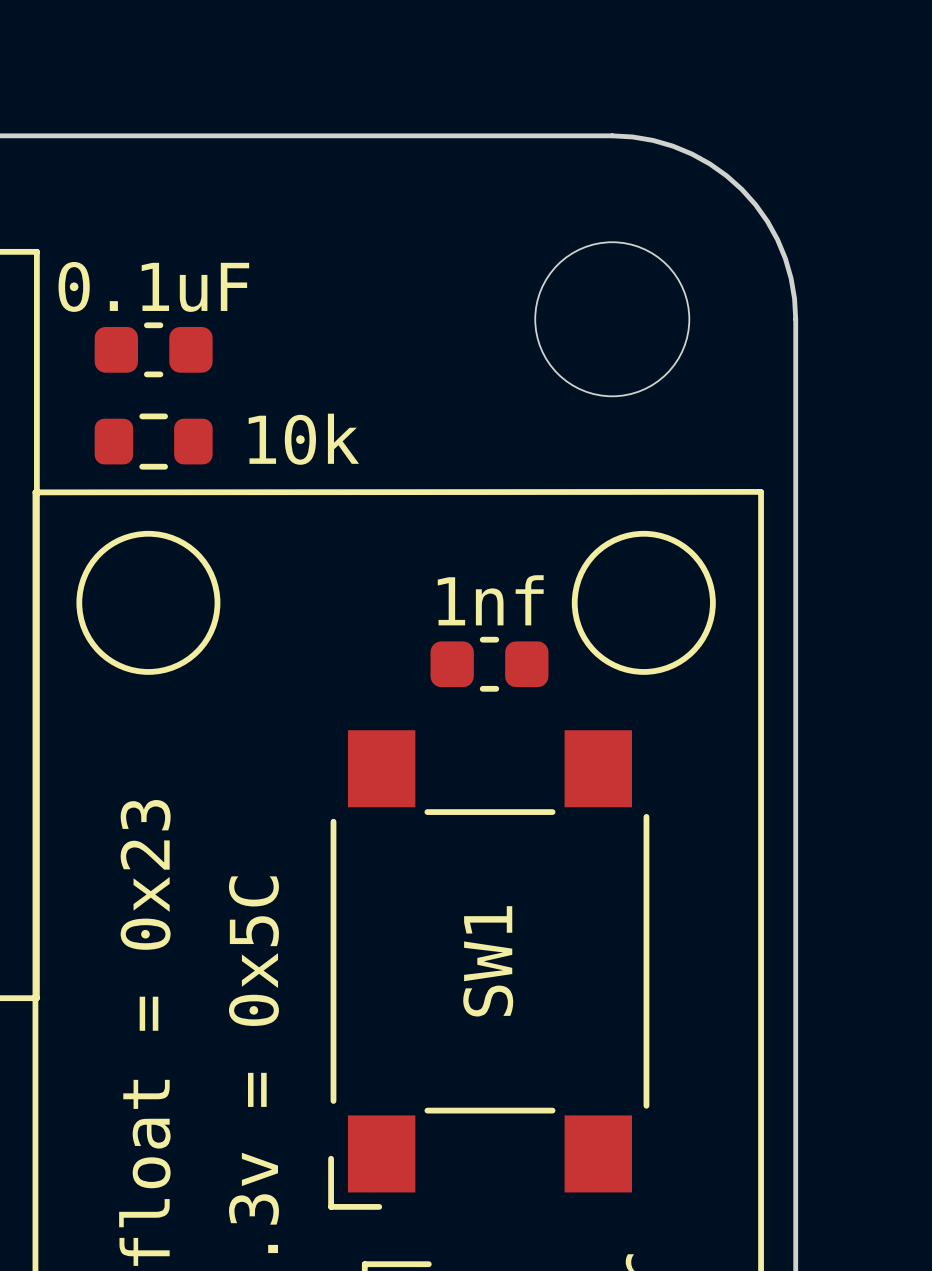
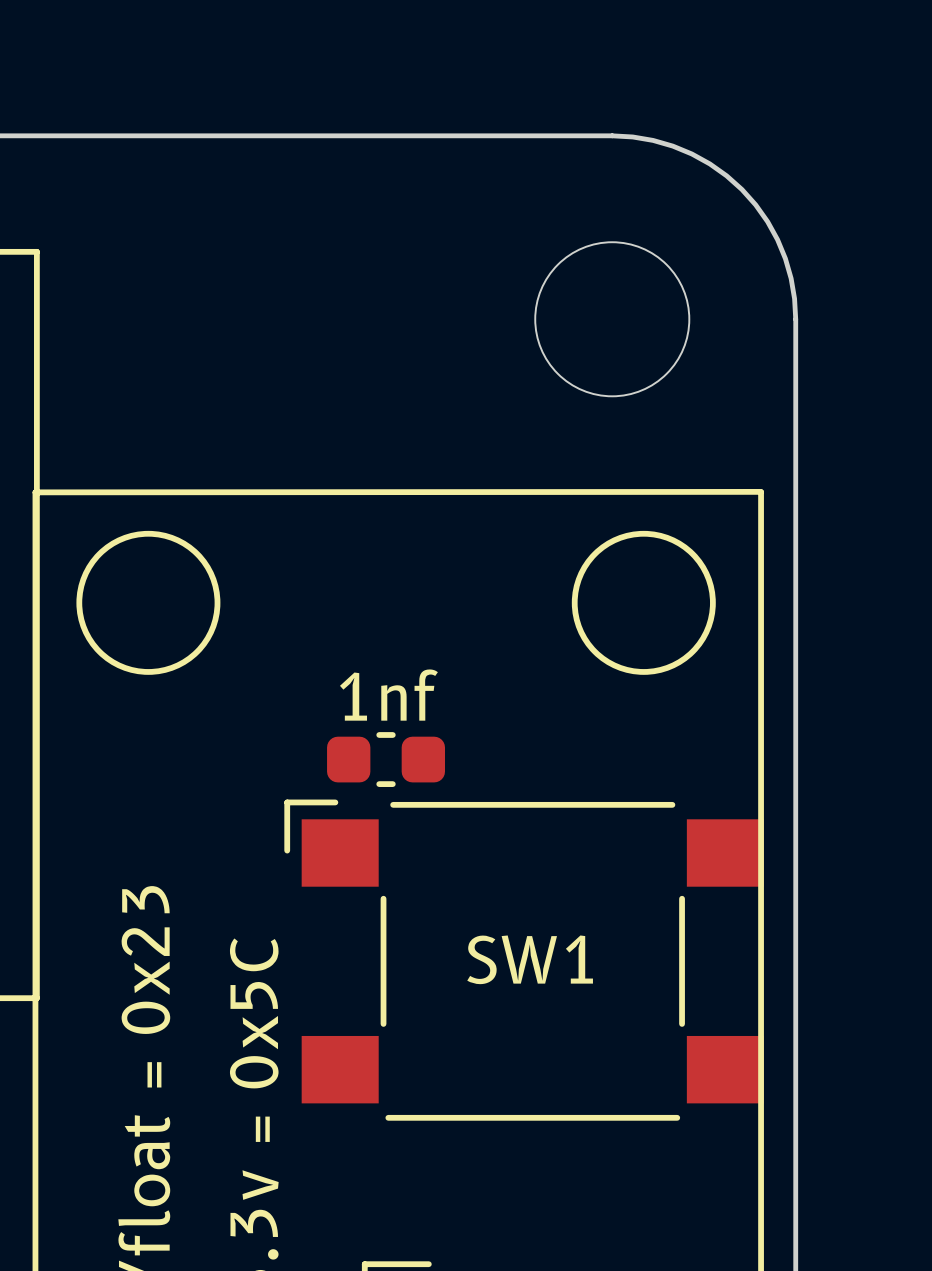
part: 0.1uF (153, 349) -> none
part: 10k (153, 441) -> none
part position: (489, 664) -> (386, 759)
SW1 rotation: 0° (488, 970) -> 90° clockwise (524, 960)

